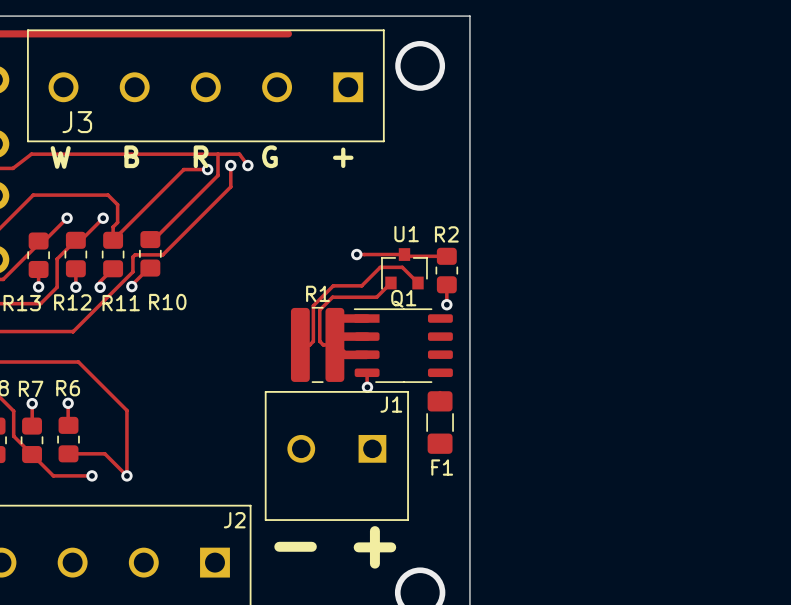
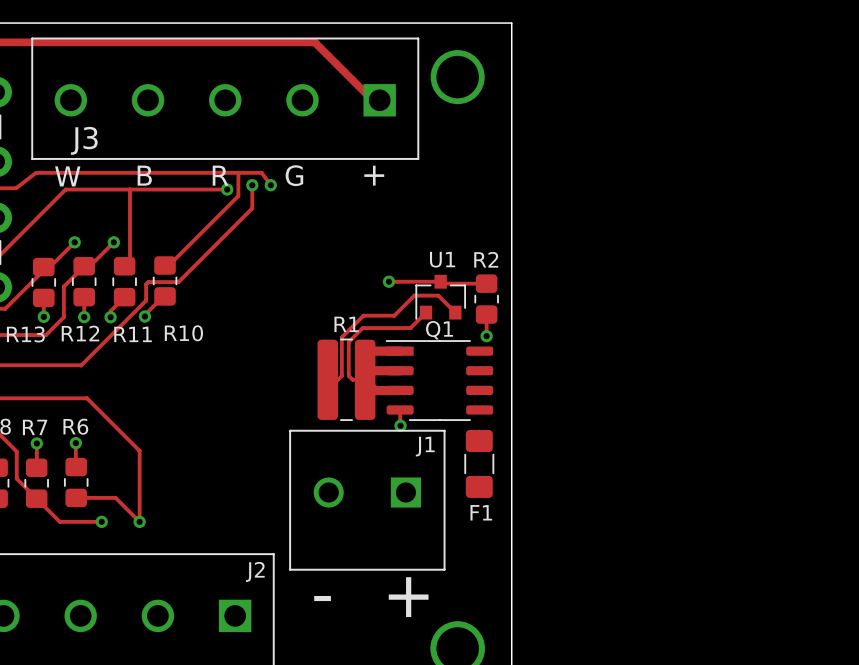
track: none -> (314, 42) (372, 99)
track: none -> (130, 189) (130, 263)
track: (183, 169) (113, 240) (113, 227) (117, 222) (117, 204) (108, 195) (33, 195) -> (201, 189) (65, 189) (38, 217)

